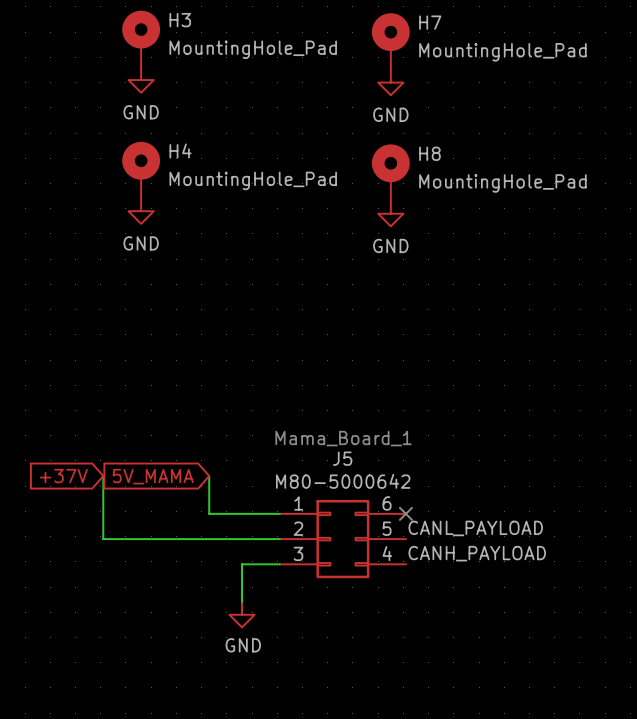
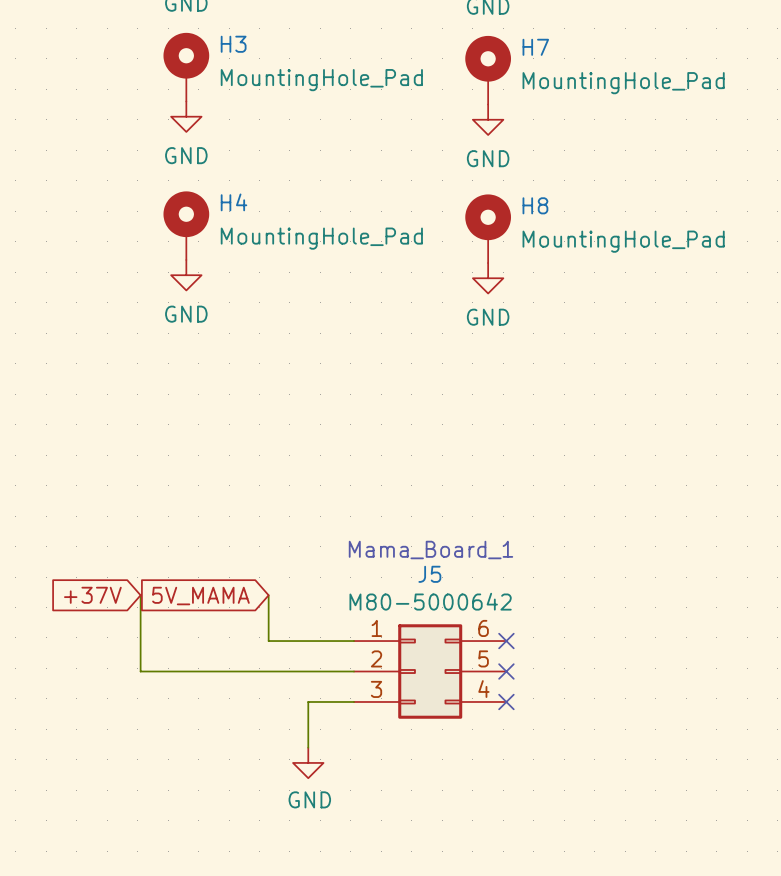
label: CANL_PAYLOAD (475, 528) -> none
no-connect mark: none -> (506, 671)
label: CANH_PAYLOAD (477, 553) -> none
no-connect mark: none -> (506, 701)

